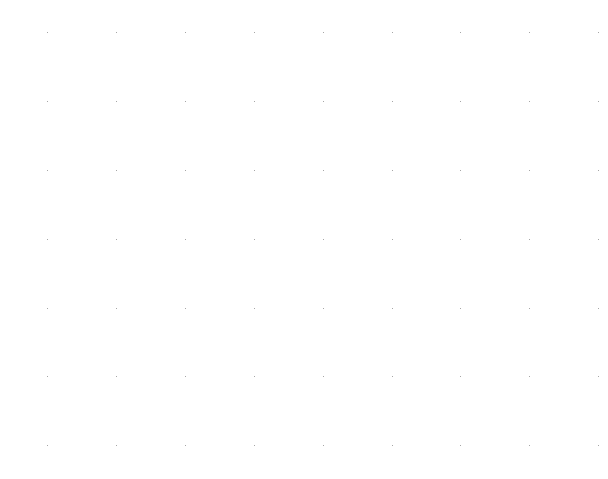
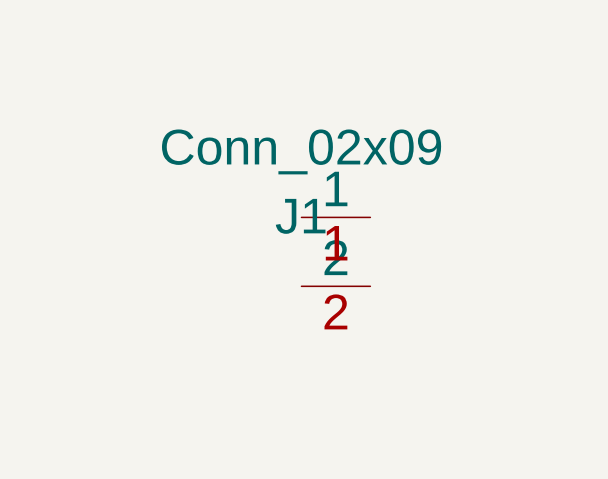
J1: none -> Conn_02x09 (335, 251)

